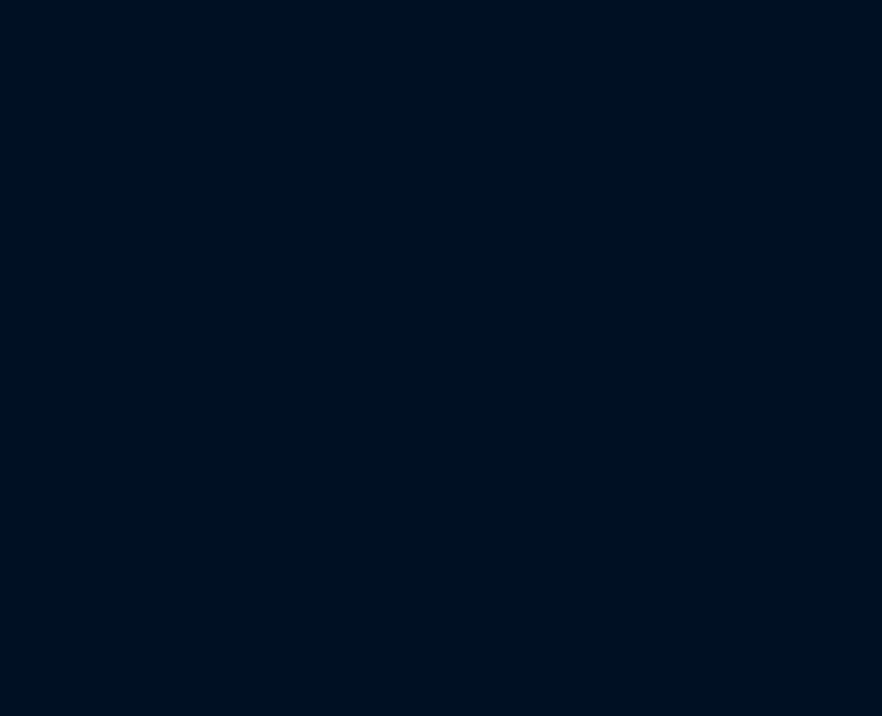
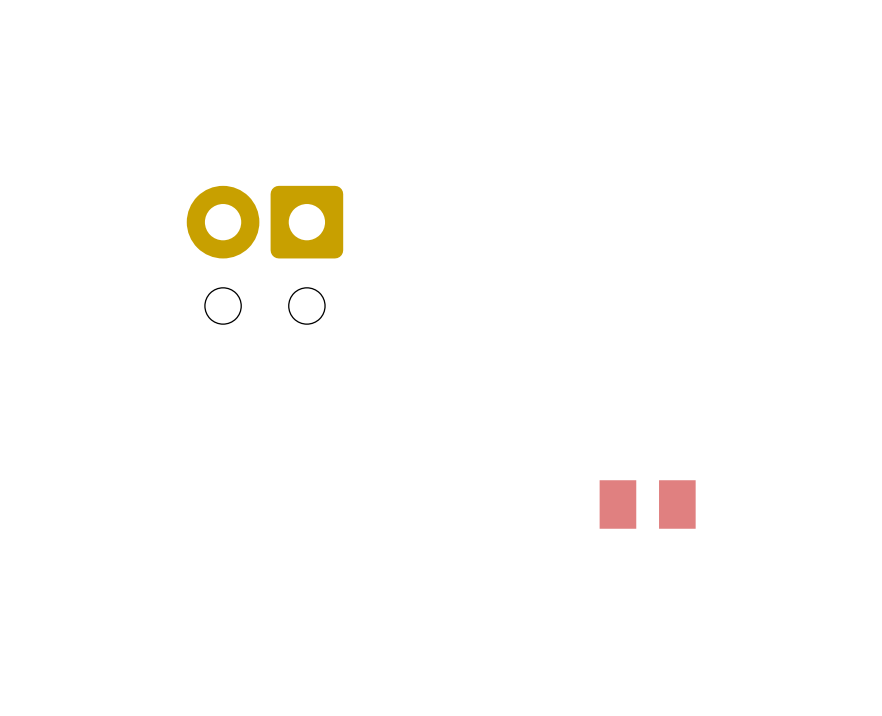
part: none -> (264, 254)
part: none -> (647, 504)

